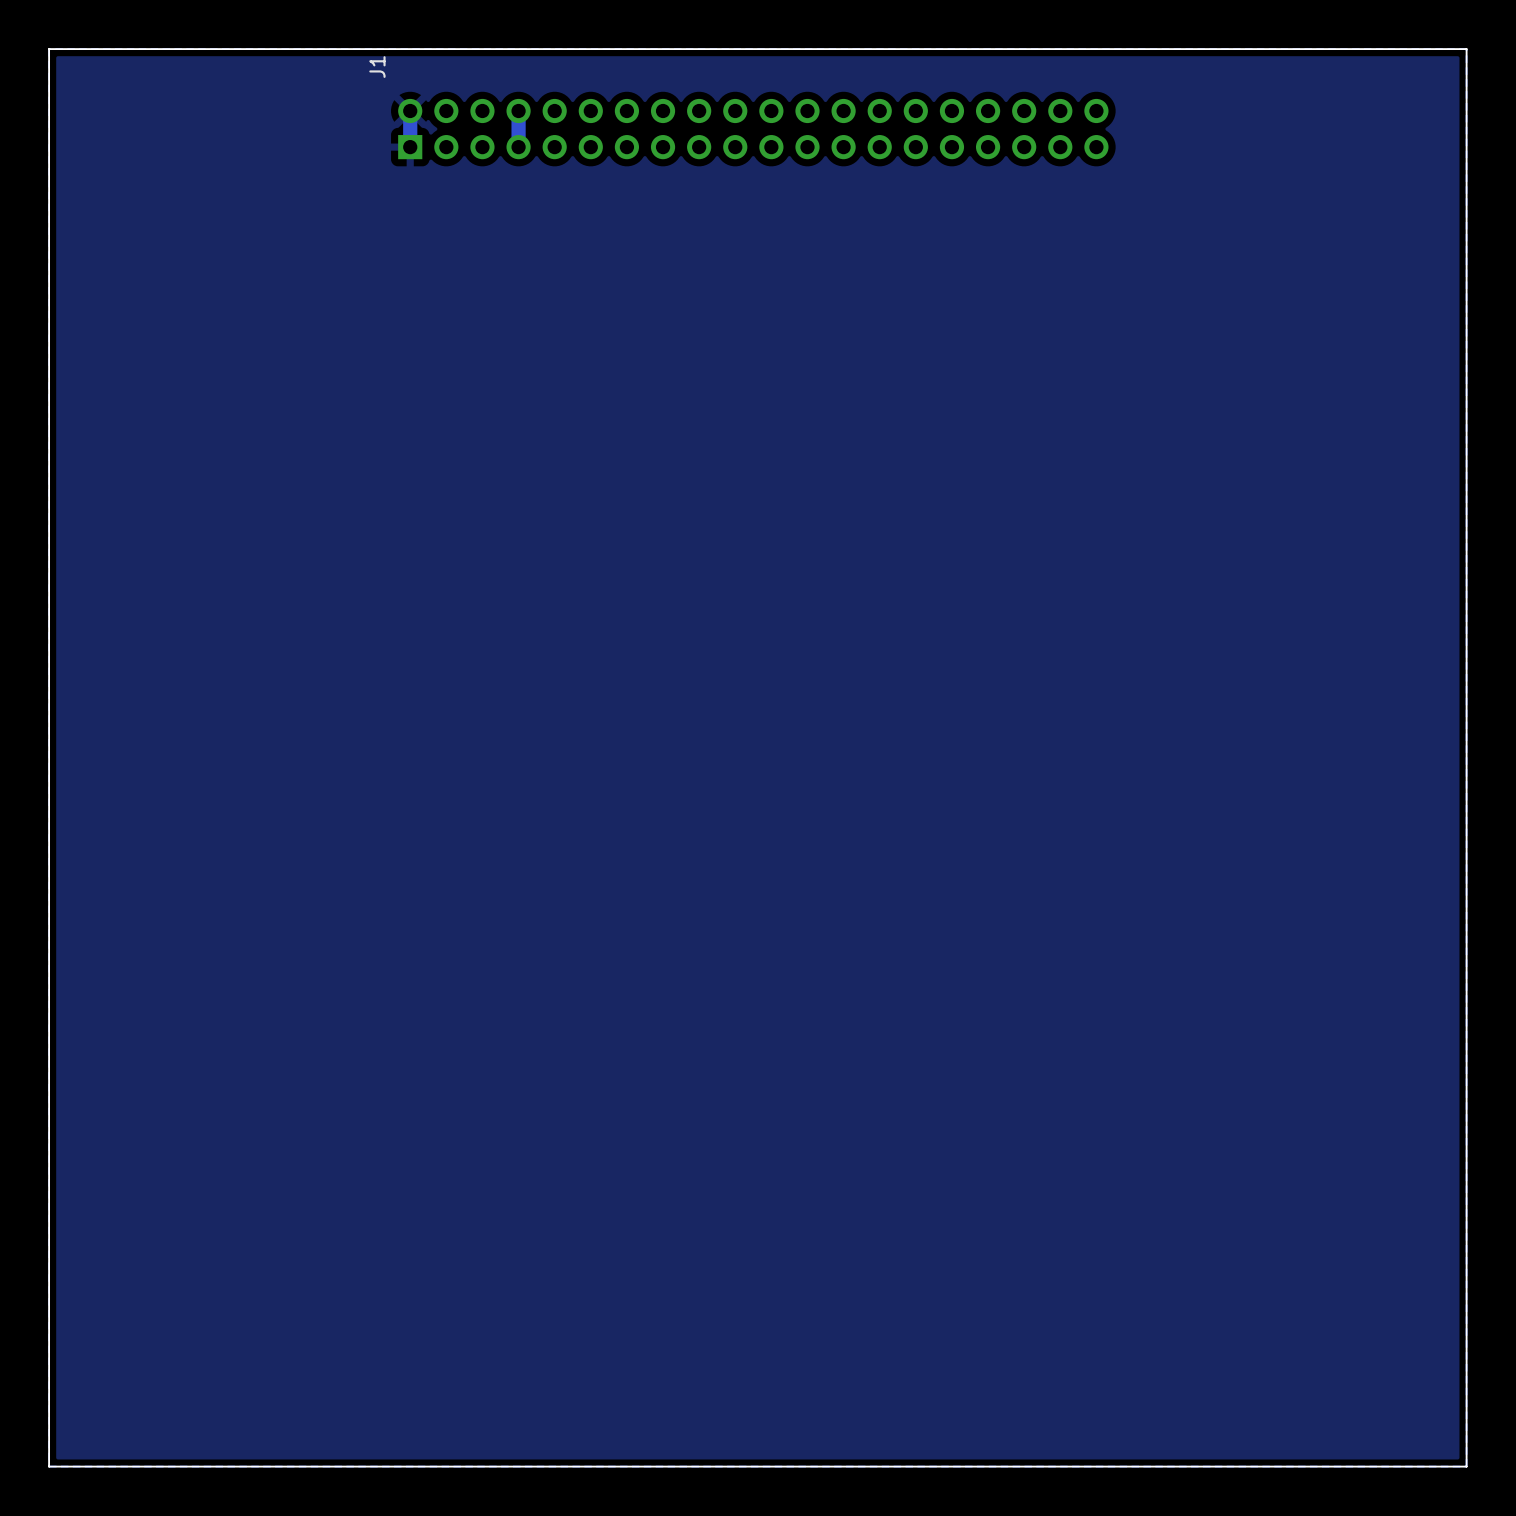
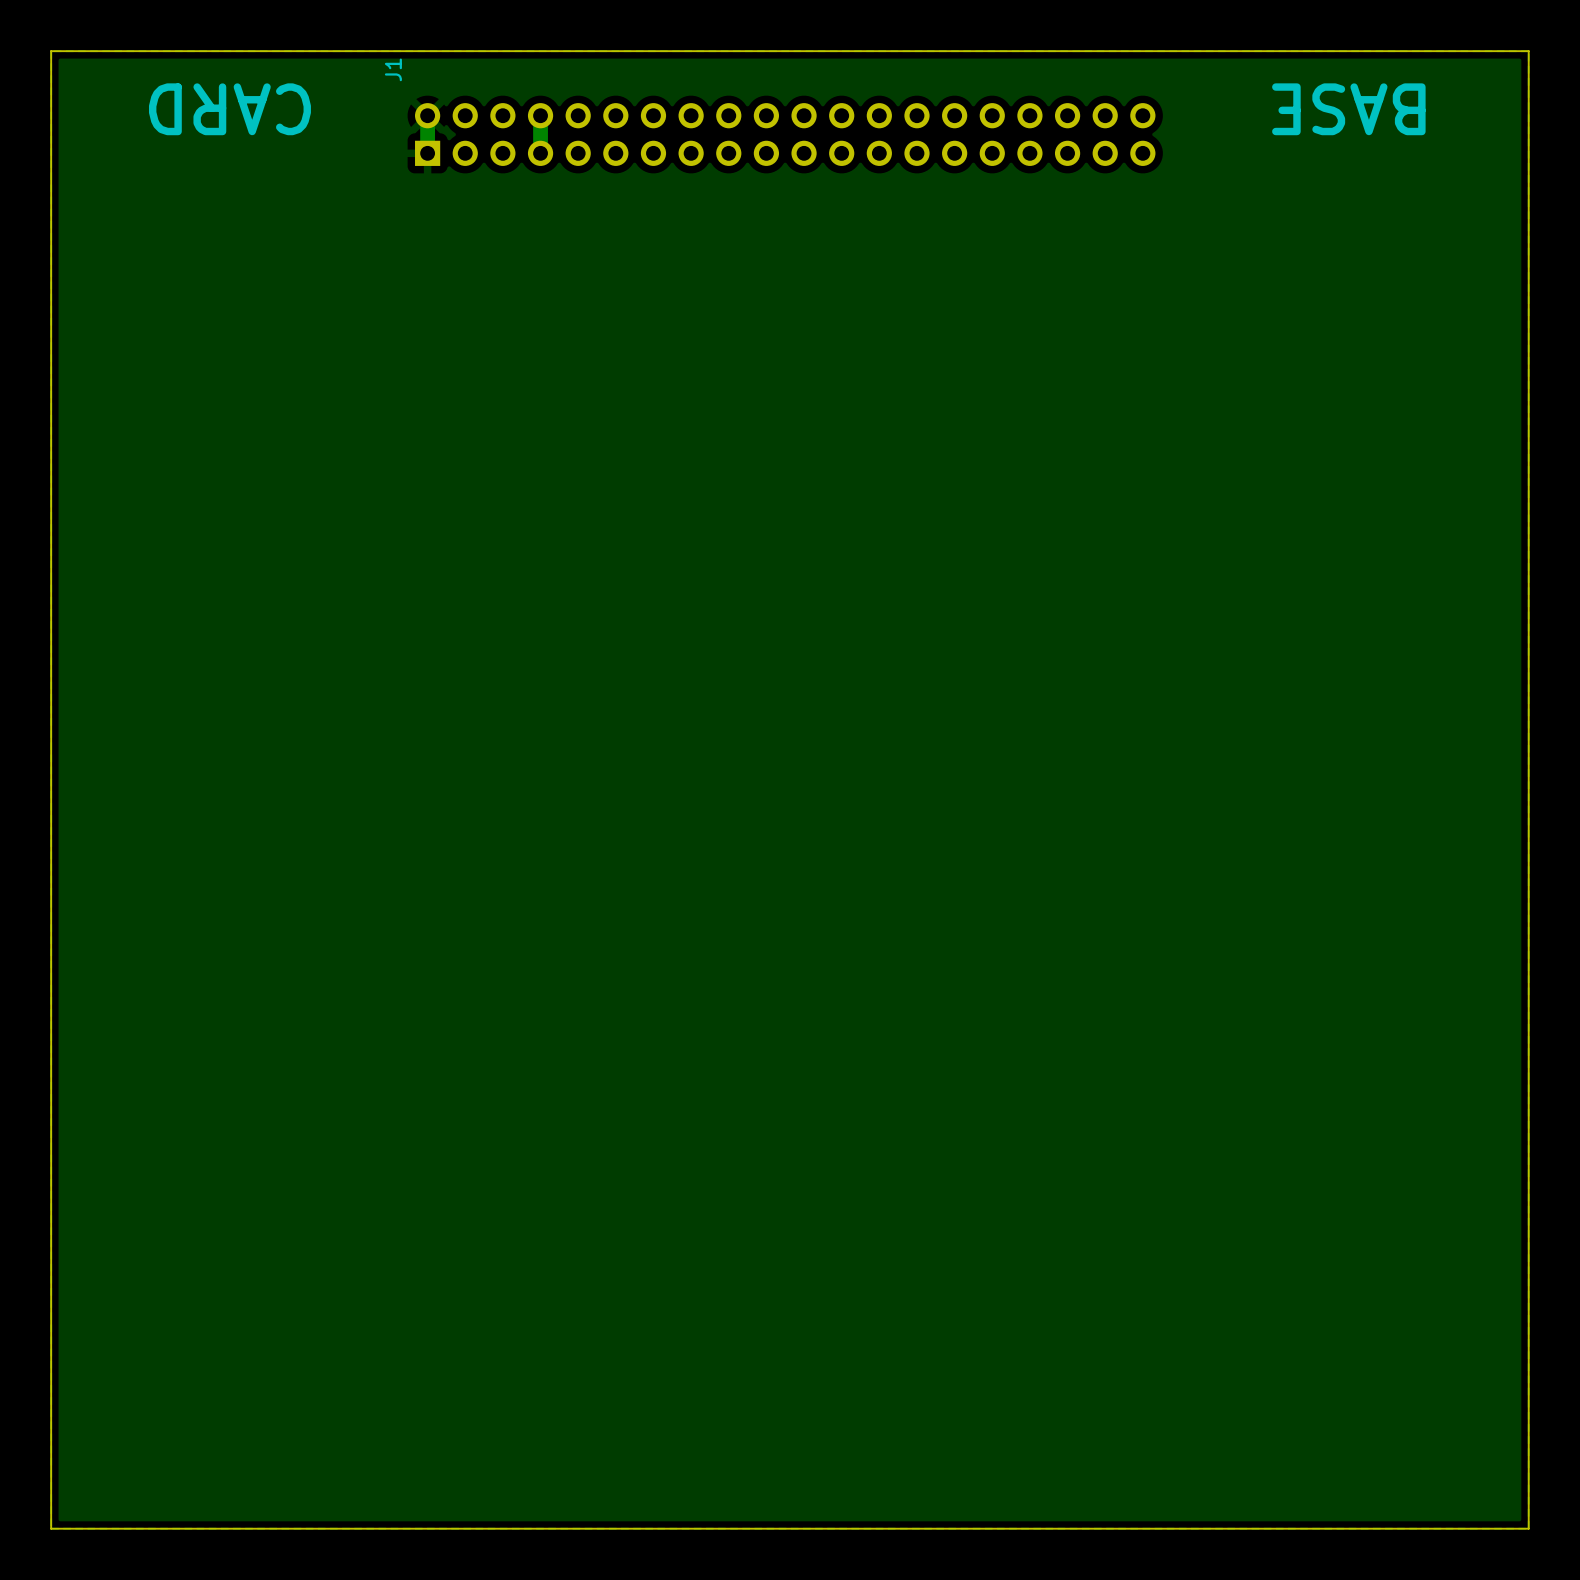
text: none -> CARD (229, 109)
text: none -> BASE (1348, 109)

